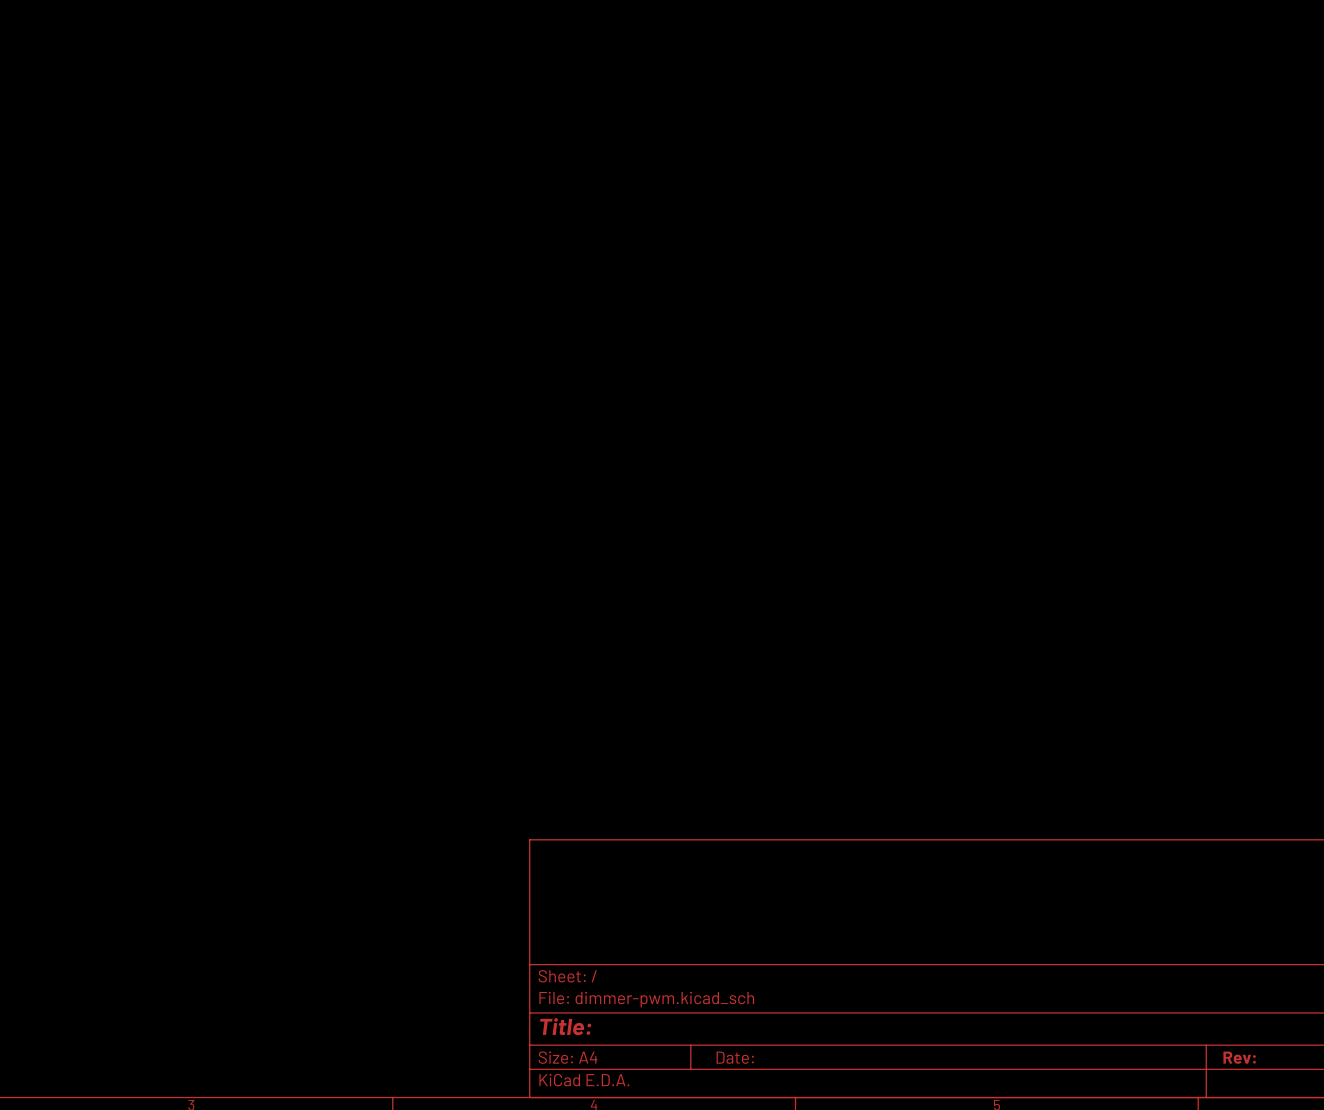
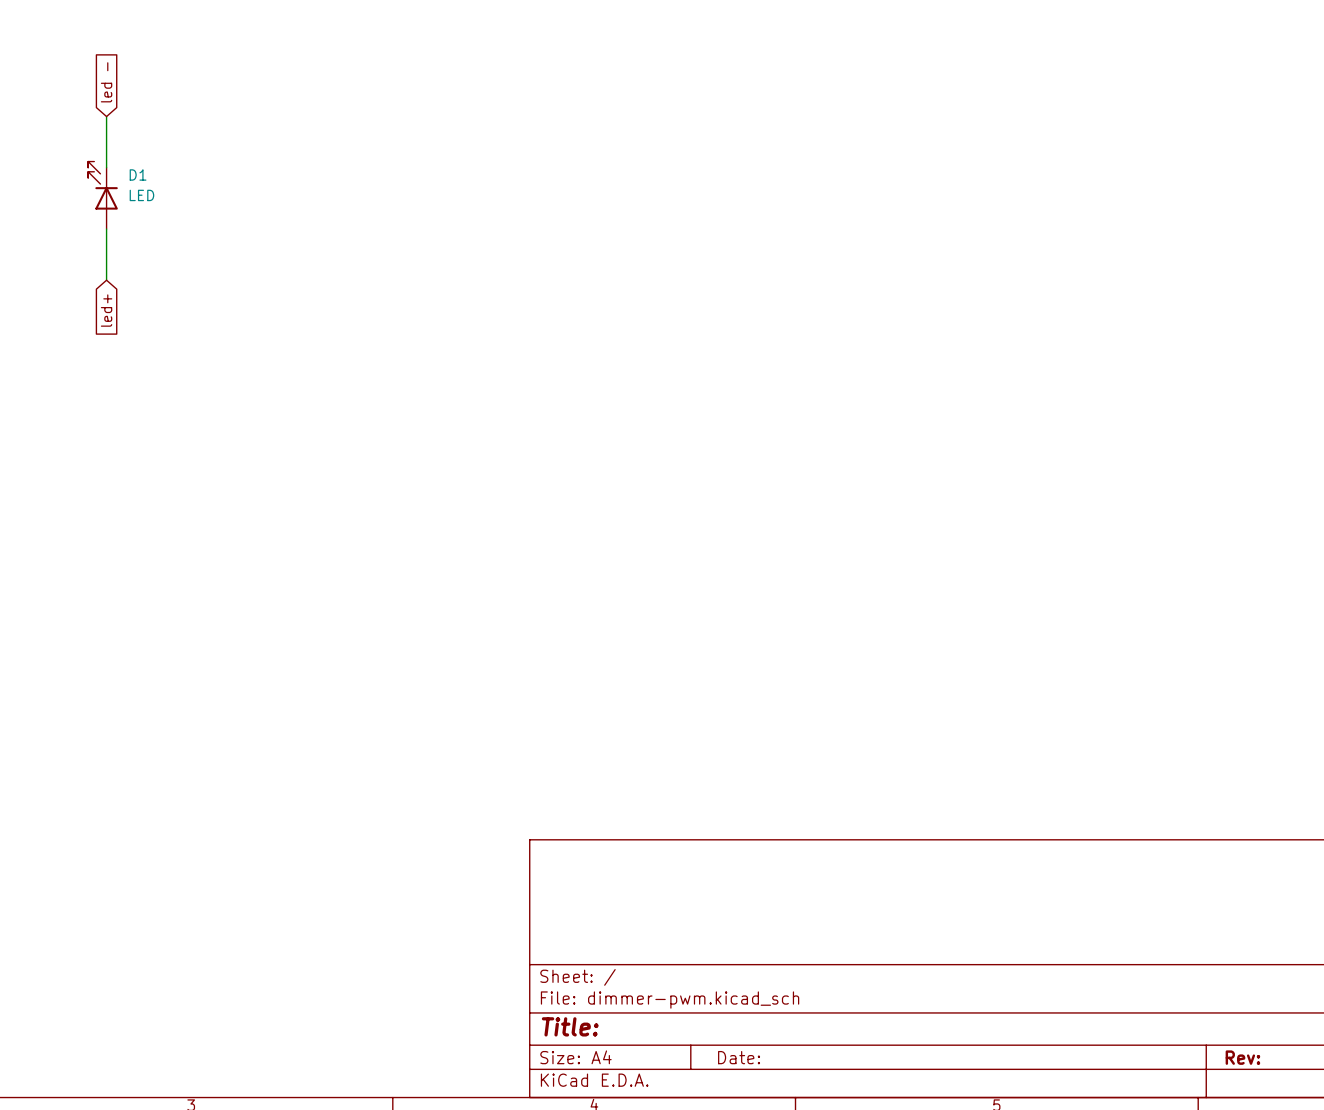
global label: none -> led - (106, 82)
wire: none -> (106, 116) (106, 167)
D1: none -> LED (102, 195)
wire: none -> (106, 229) (106, 280)
global label: none -> led+ (106, 310)

